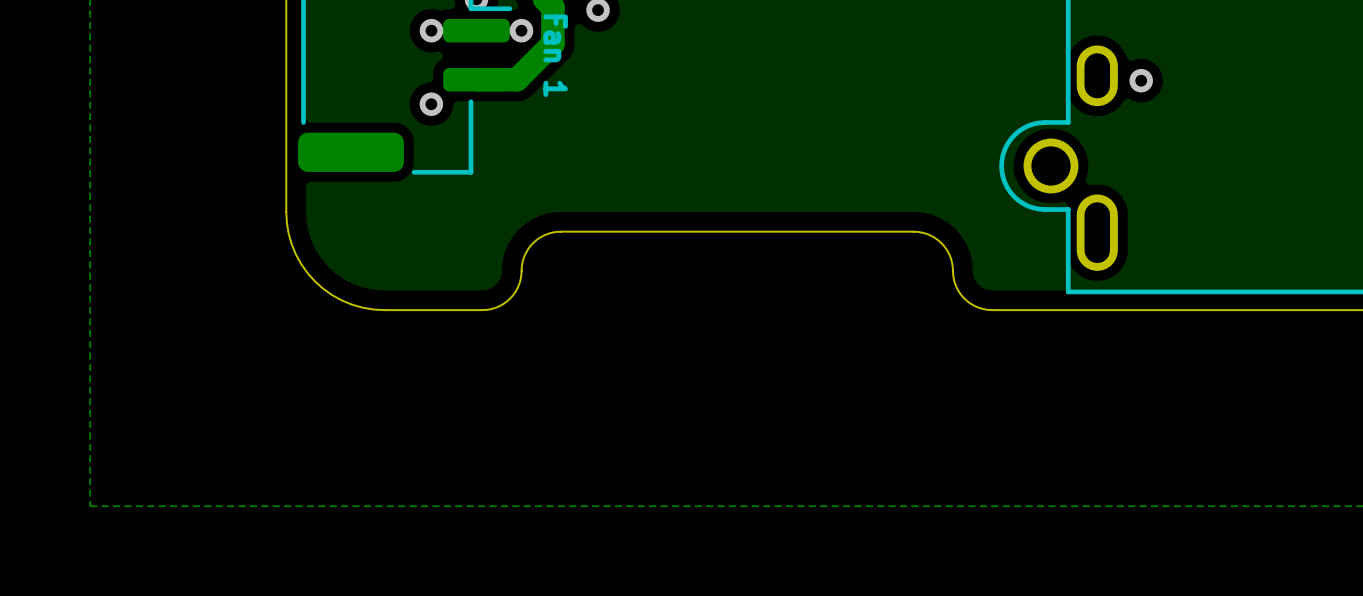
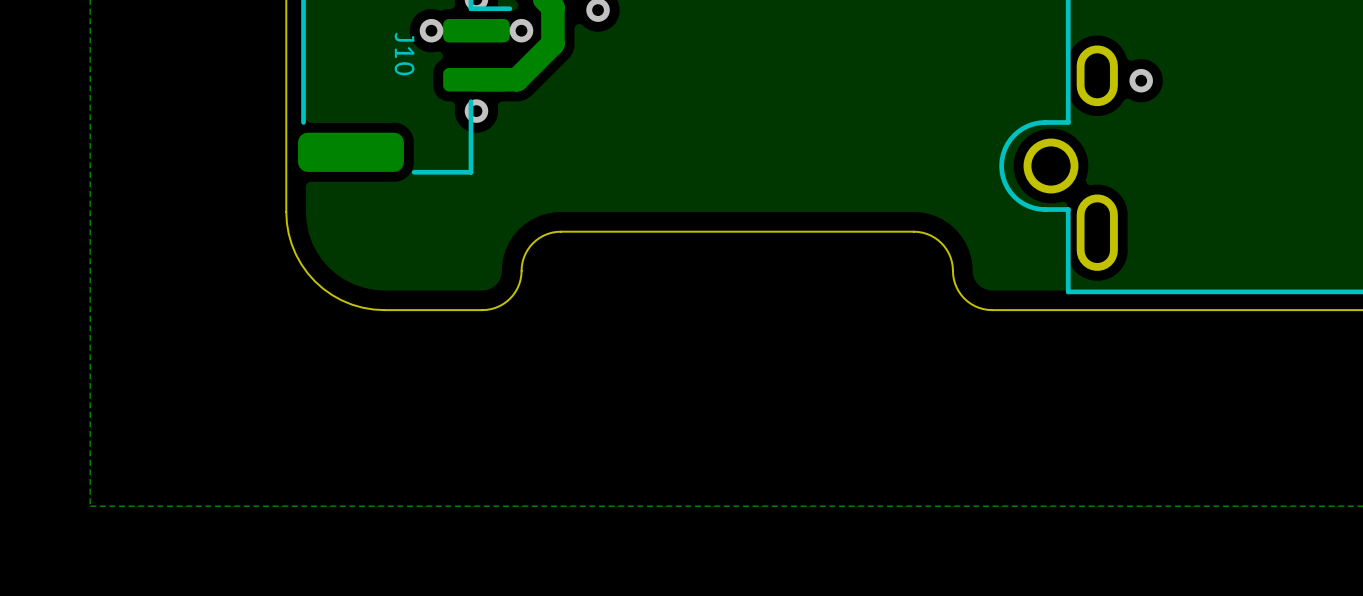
J10 name: none -> J10 (404, 53)
J10 value: Fan 1 (555, 55) -> none
via position: (431, 104) -> (476, 111)

